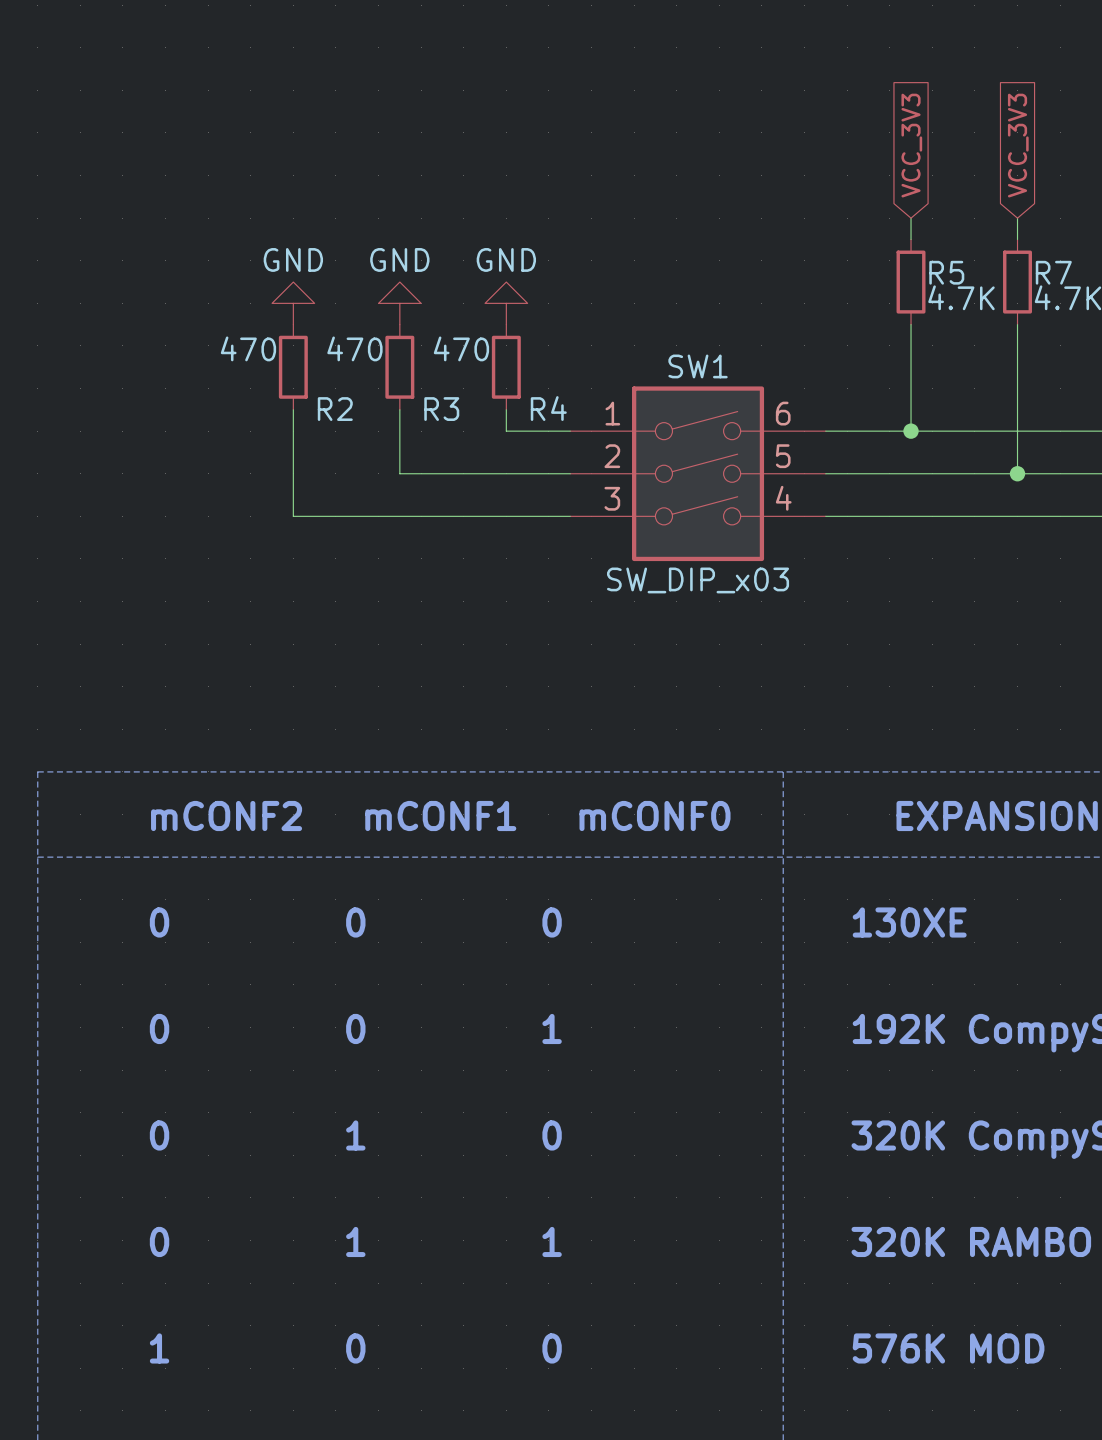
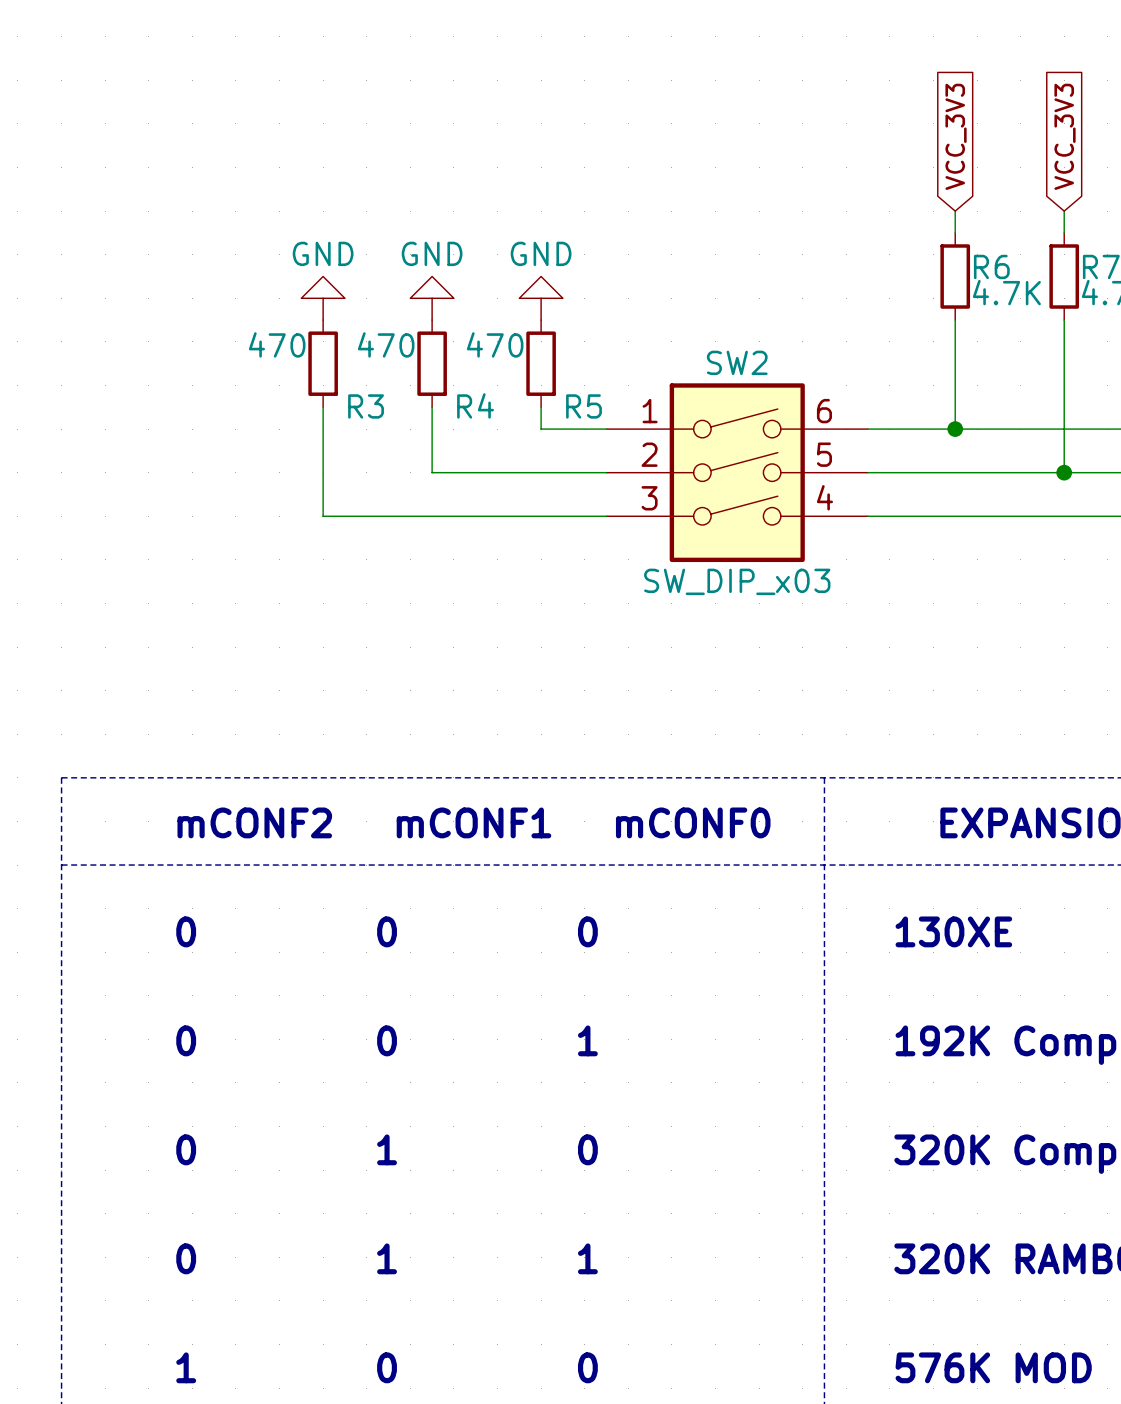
R5 name: R5 (946, 272) -> R6 (991, 266)
SW1 name: SW1 (698, 366) -> SW2 (737, 362)
R4 name: R4 (548, 408) -> R5 (584, 406)
R2 name: R2 (335, 409) -> R3 (366, 406)
R3 name: R3 (441, 409) -> R4 (475, 405)

